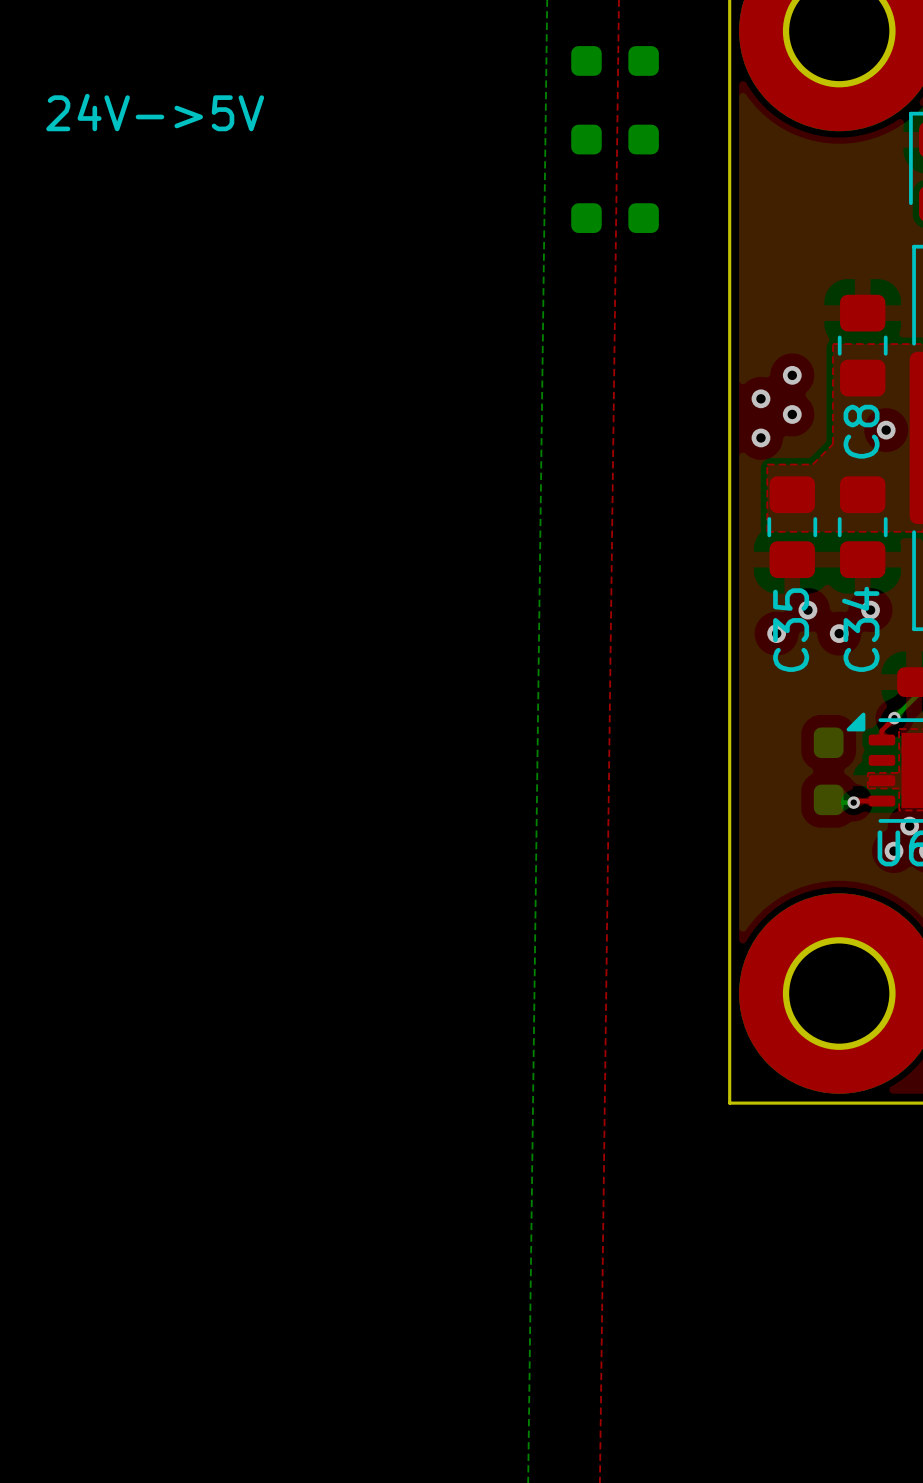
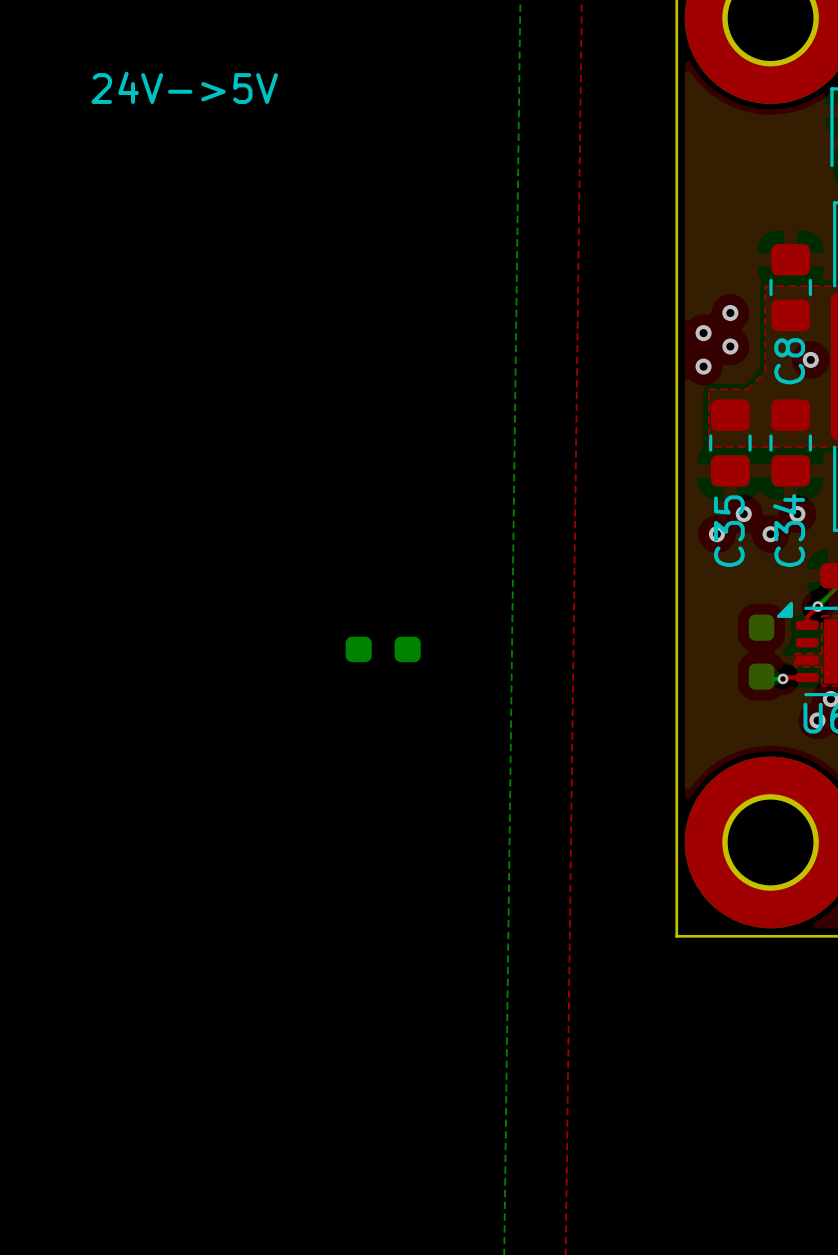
part: (615, 60) -> none
part: (615, 139) -> none
part: (615, 218) -> none
part: none -> (383, 649)

